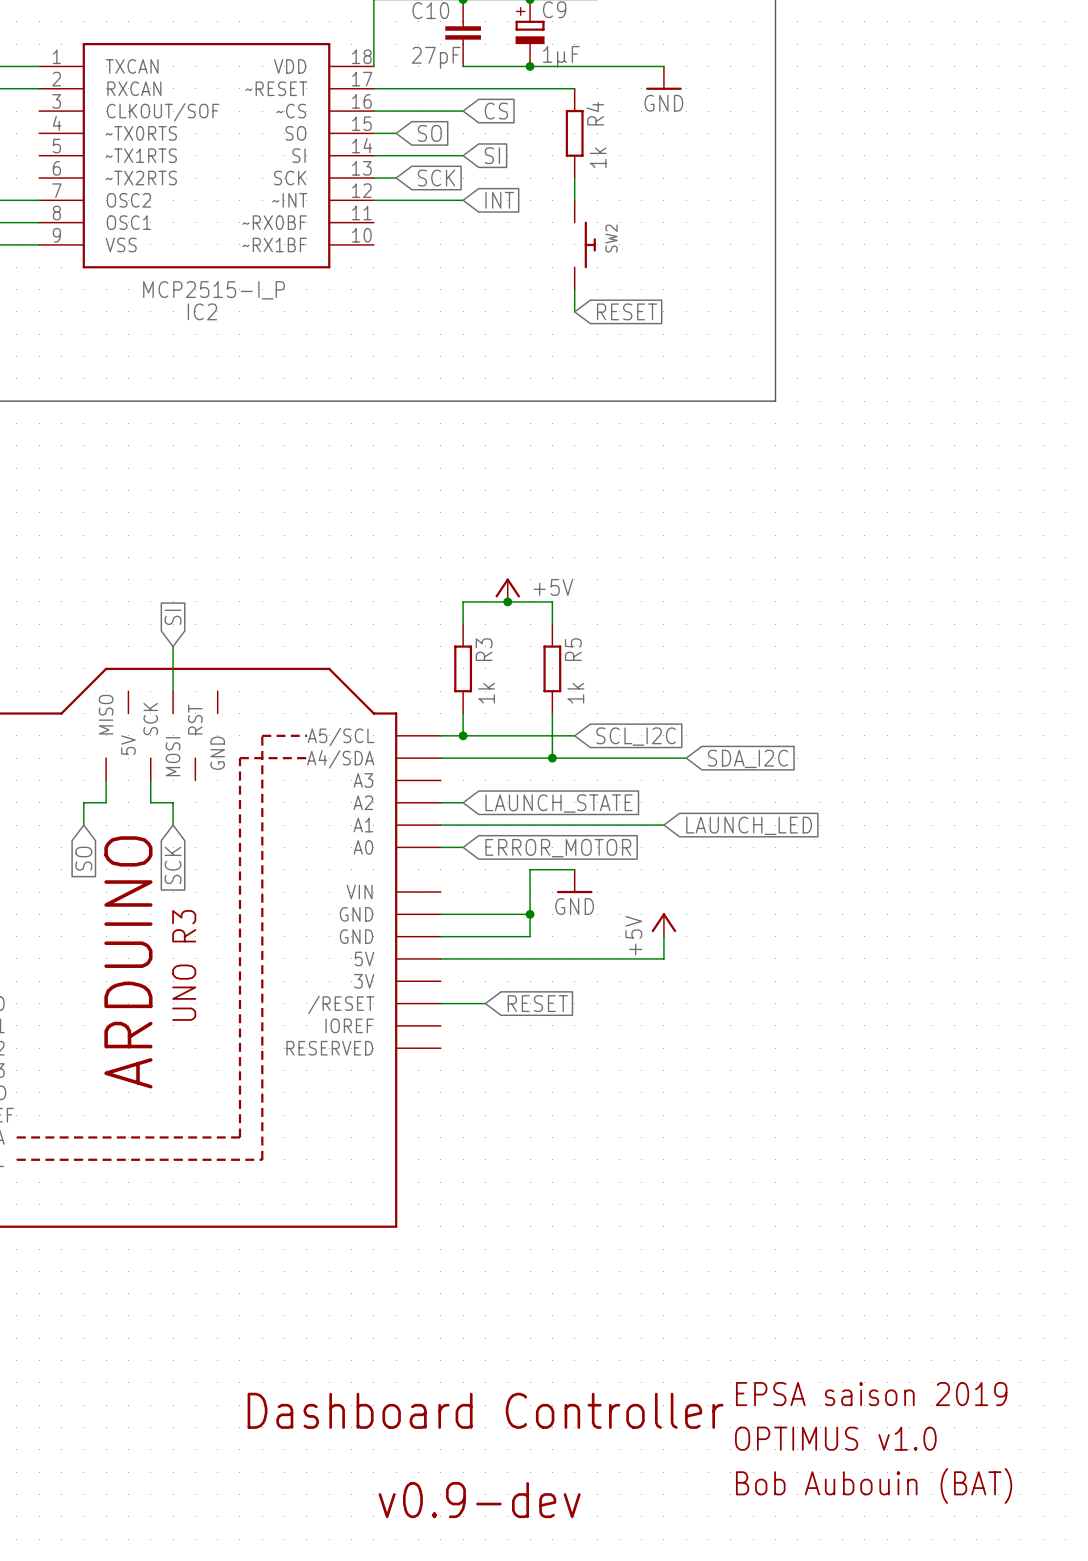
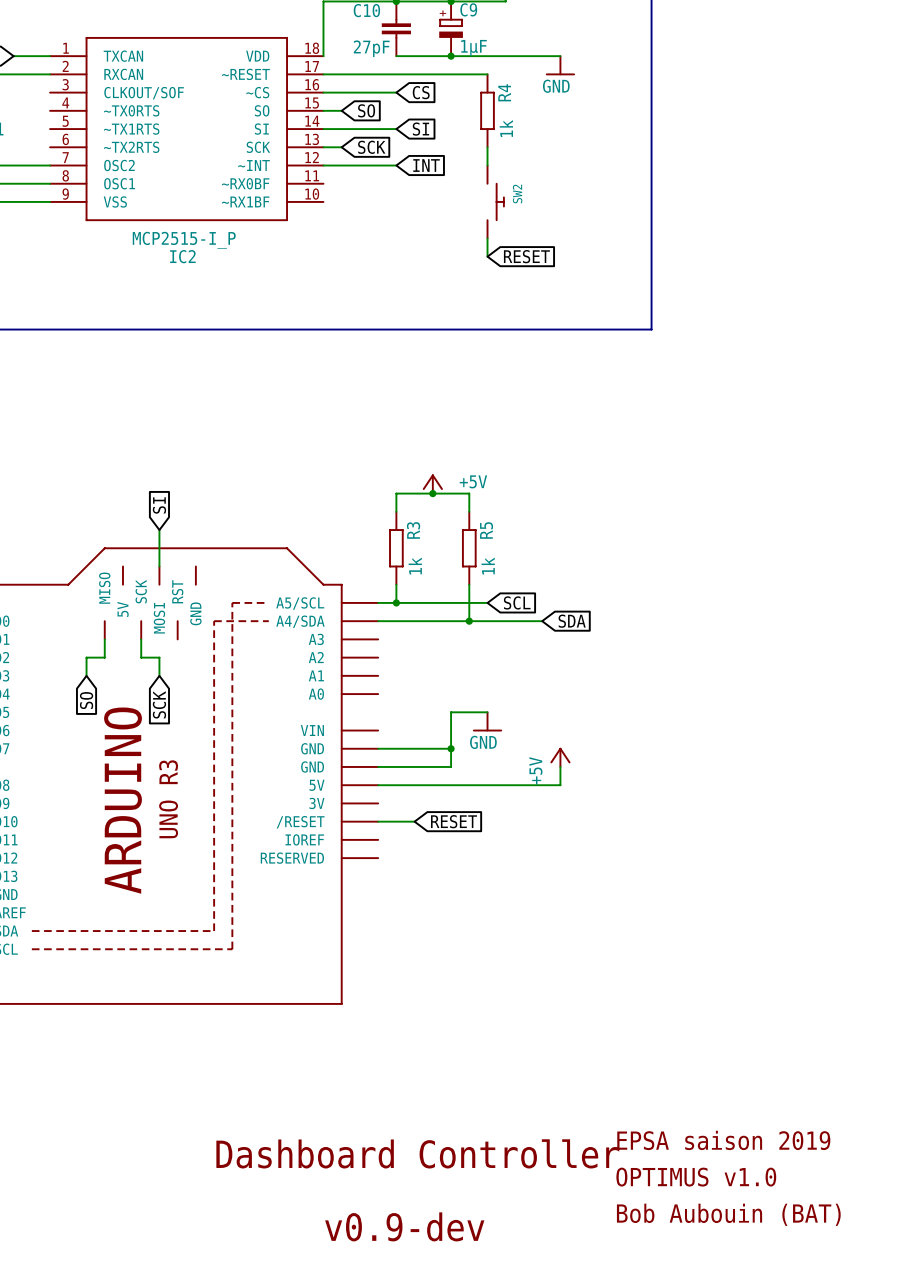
global label: SCL_I2C (636, 736) -> SCL (517, 602)
wire: (641, 758) (686, 758) -> none
global label: none -> SDA (572, 621)
global label: SDA_I2C (747, 758) -> none
wire: (440, 802) (463, 802) -> none
global label: LAUNCH_STATE (558, 803) -> none
wire: (440, 825) (663, 825) -> none
global label: LAUNCH_LED (749, 825) -> none
wire: (440, 847) (463, 847) -> none
global label: ERROR_MOTOR (558, 848) -> none

